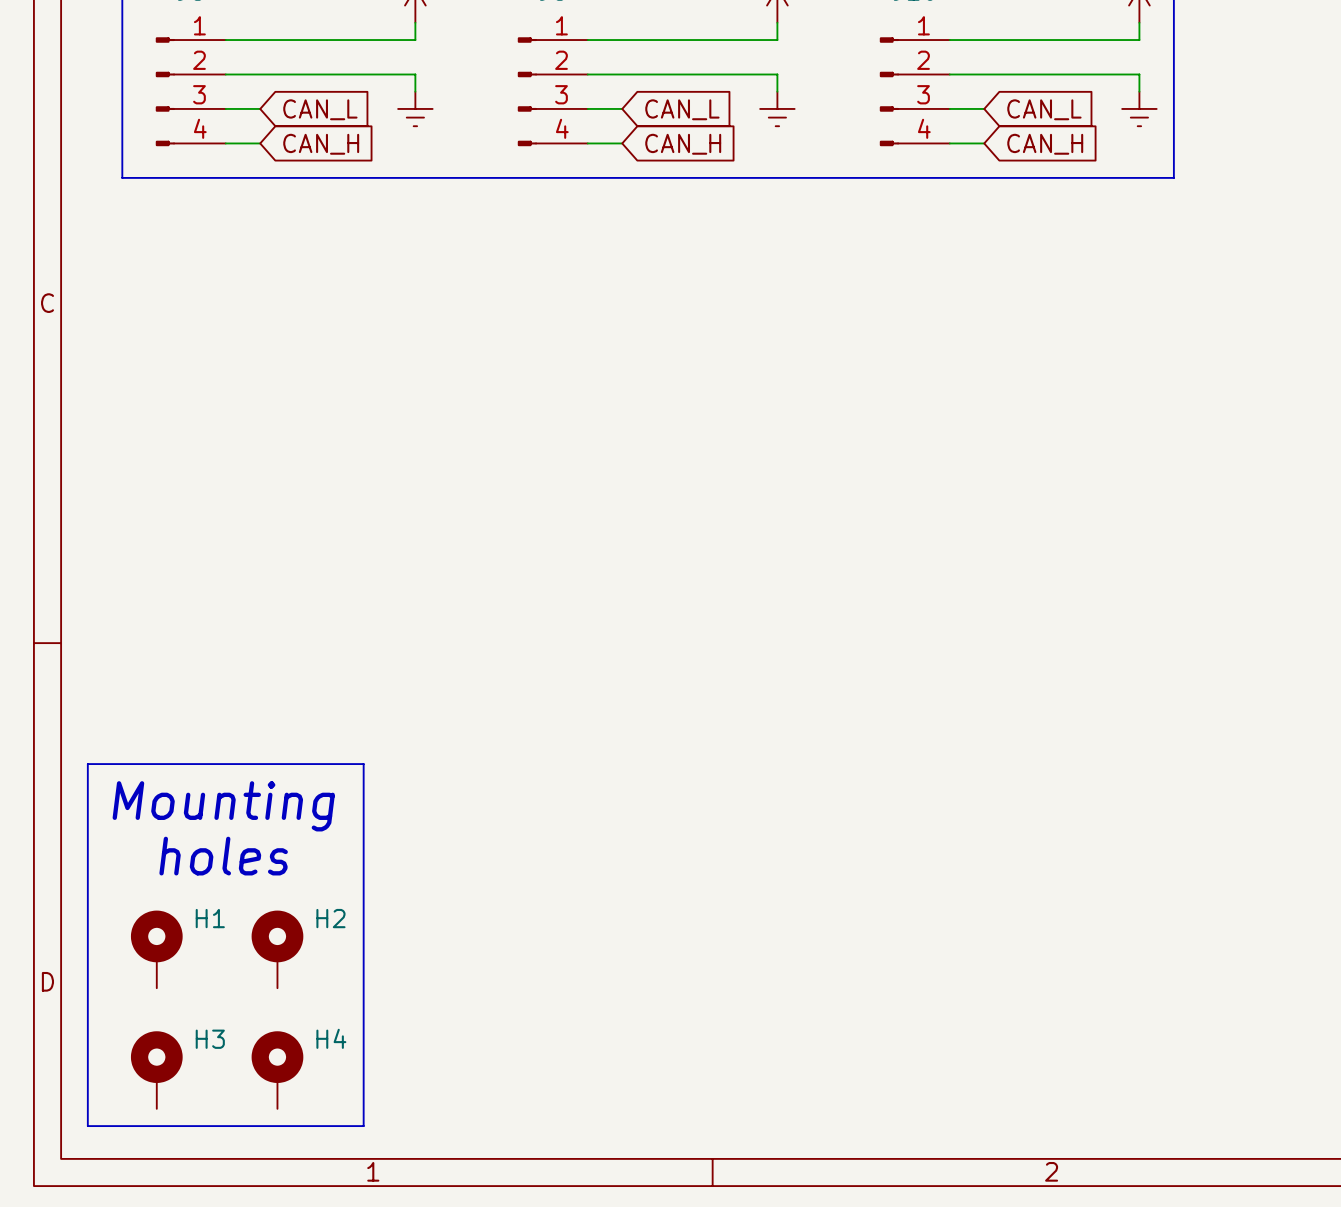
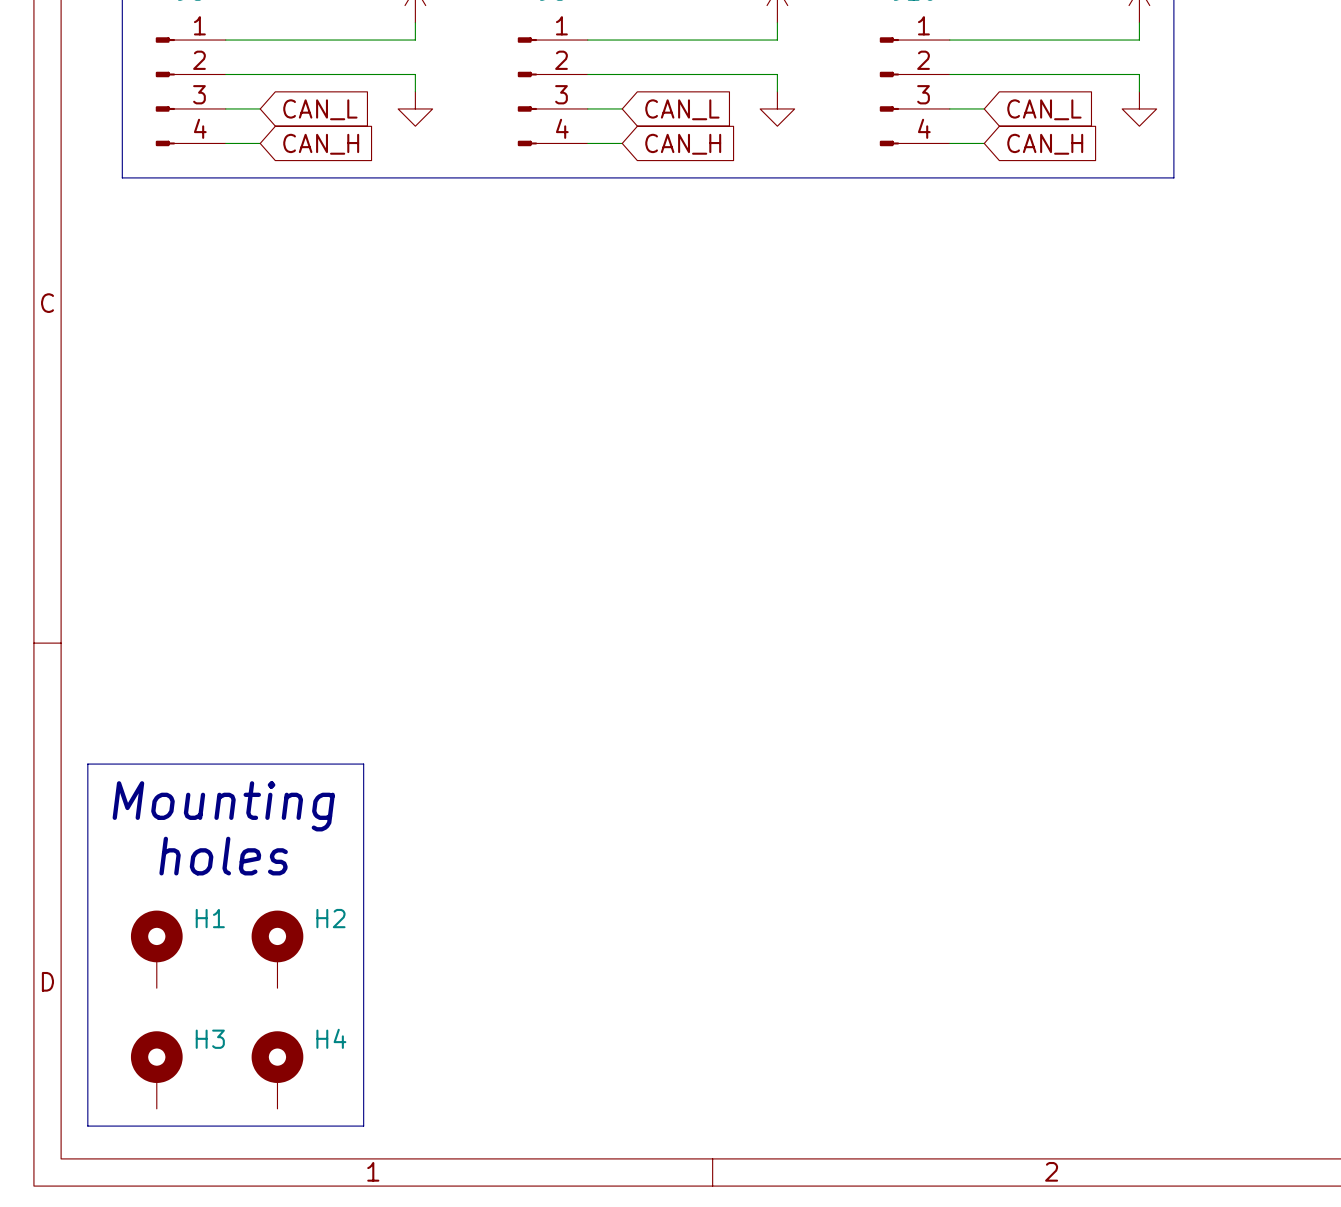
power symbol shape: [398, 91, 433, 127] -> [398, 91, 433, 127]
power symbol shape: [760, 91, 795, 127] -> [760, 91, 795, 127]
power symbol shape: [1122, 91, 1157, 127] -> [1122, 91, 1157, 127]

